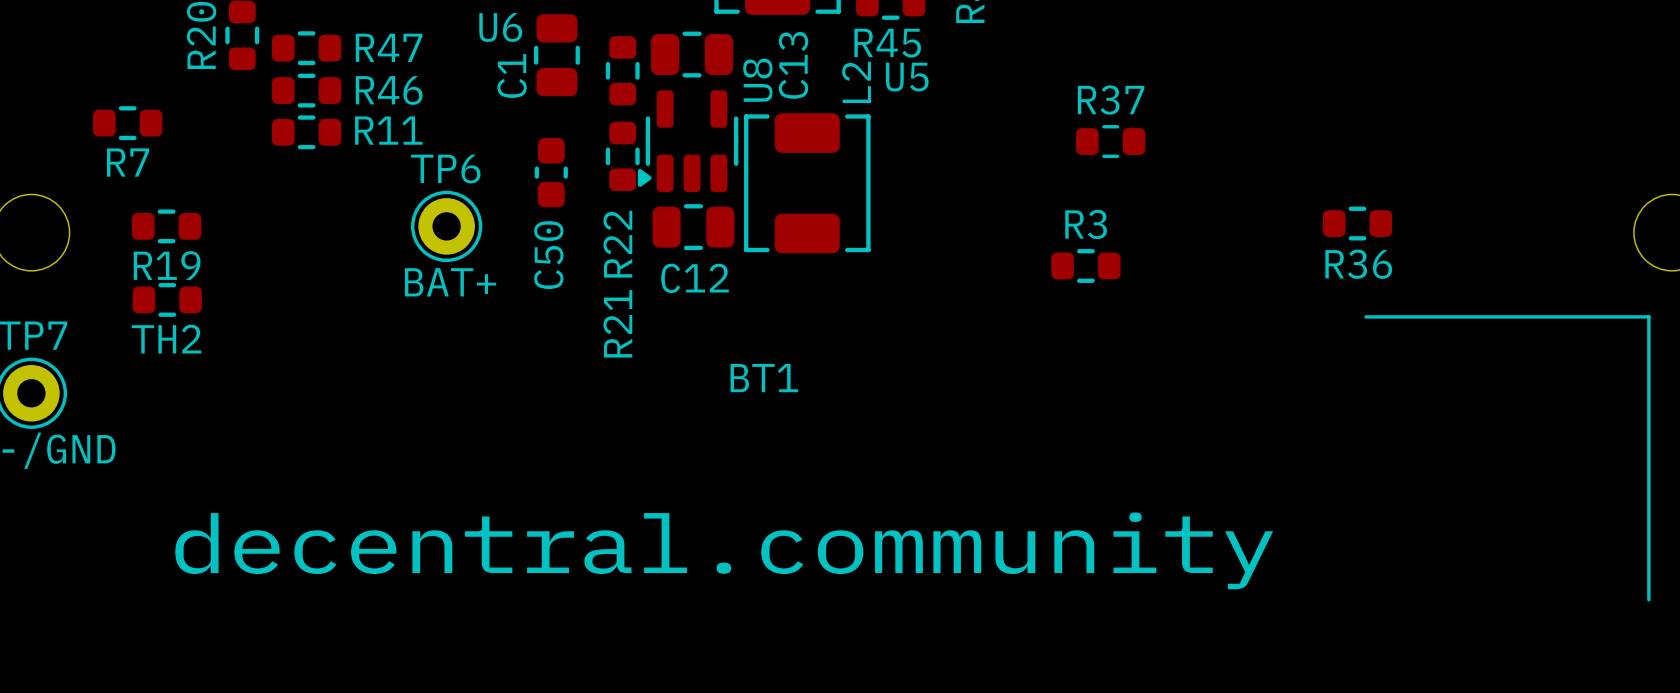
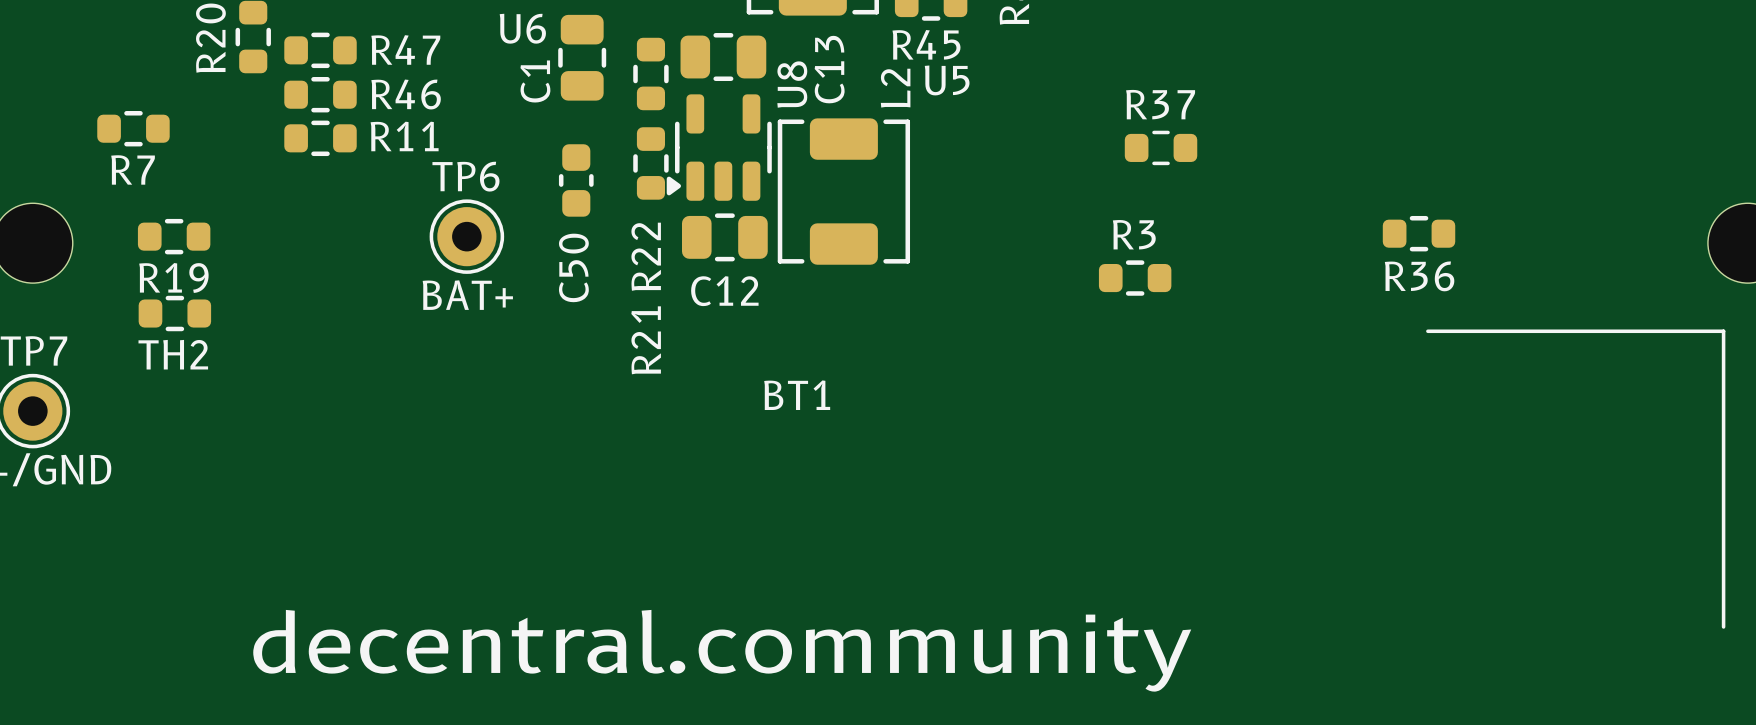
text position: decentral.community (724, 550) -> decentral.community (722, 650)

